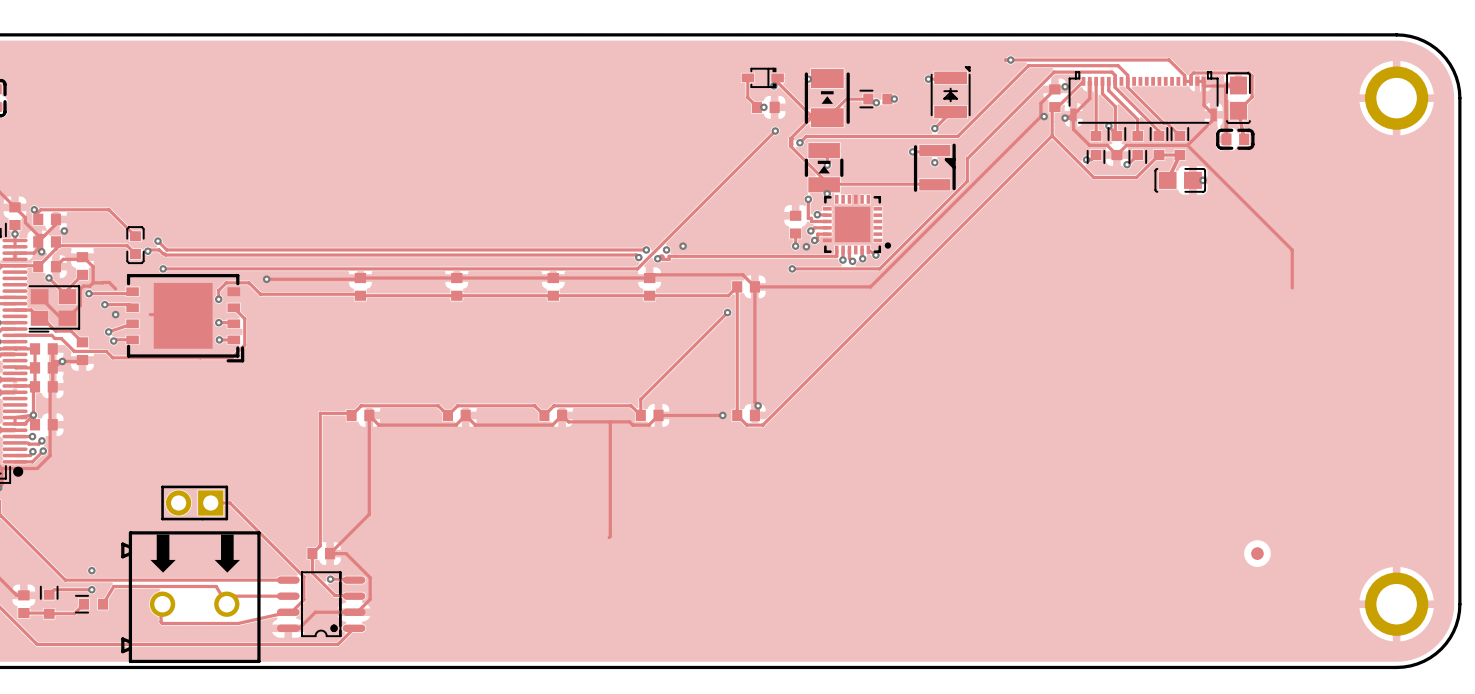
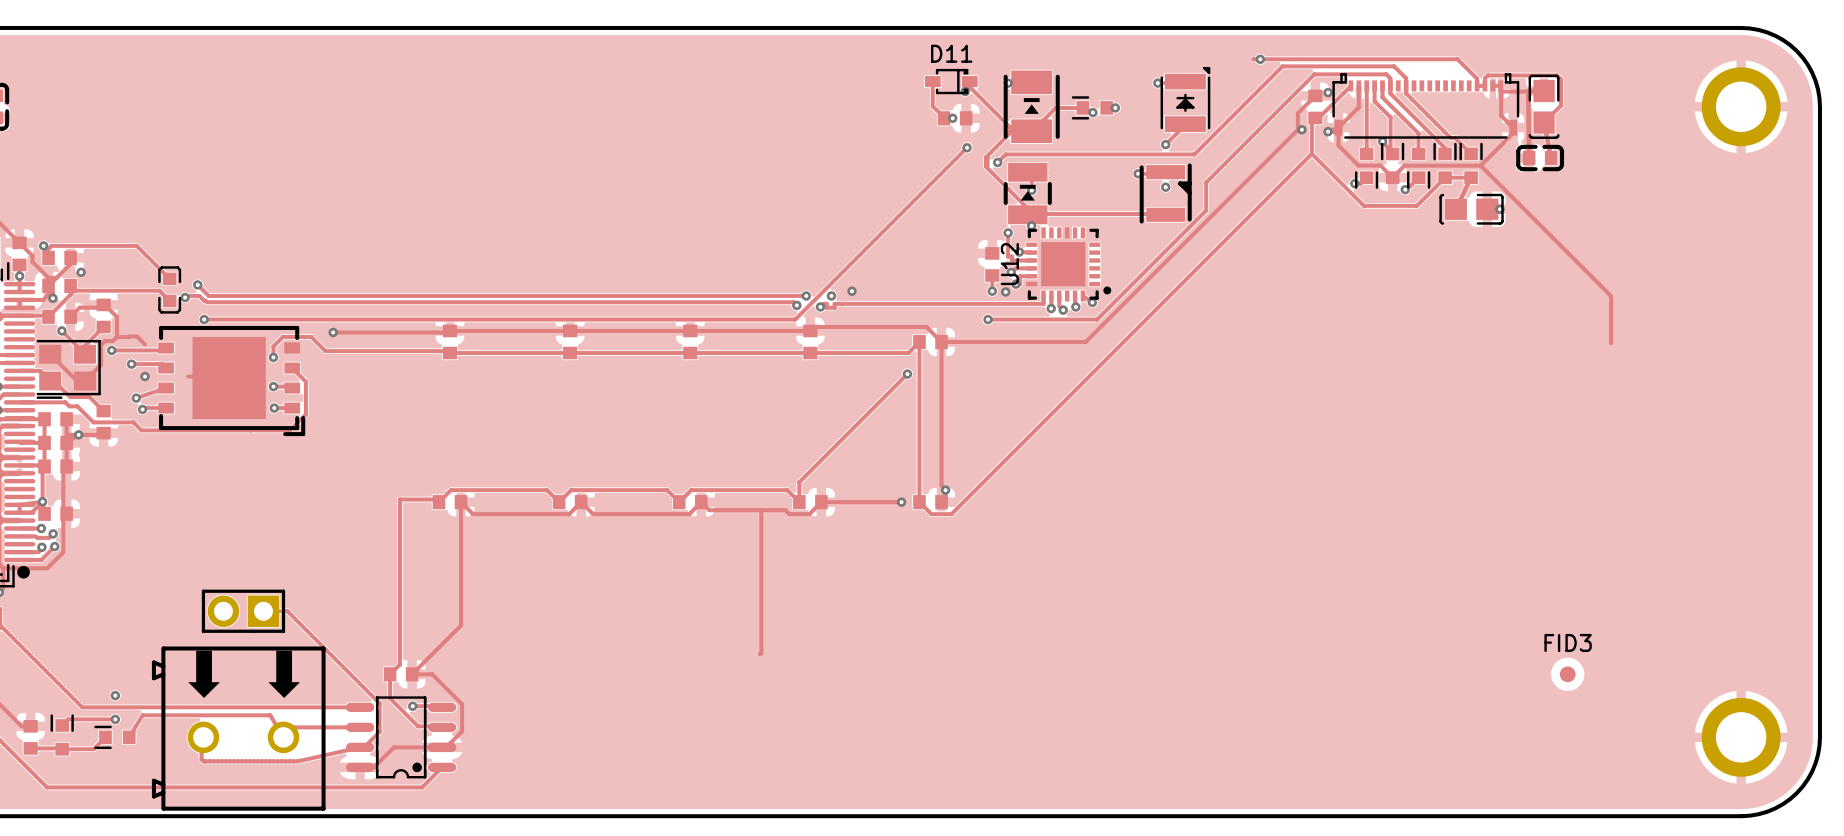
D11 name: none -> D11 (951, 53)
U12 name: none -> U12 (1009, 264)
FID3 name: none -> FID3 (1568, 642)

